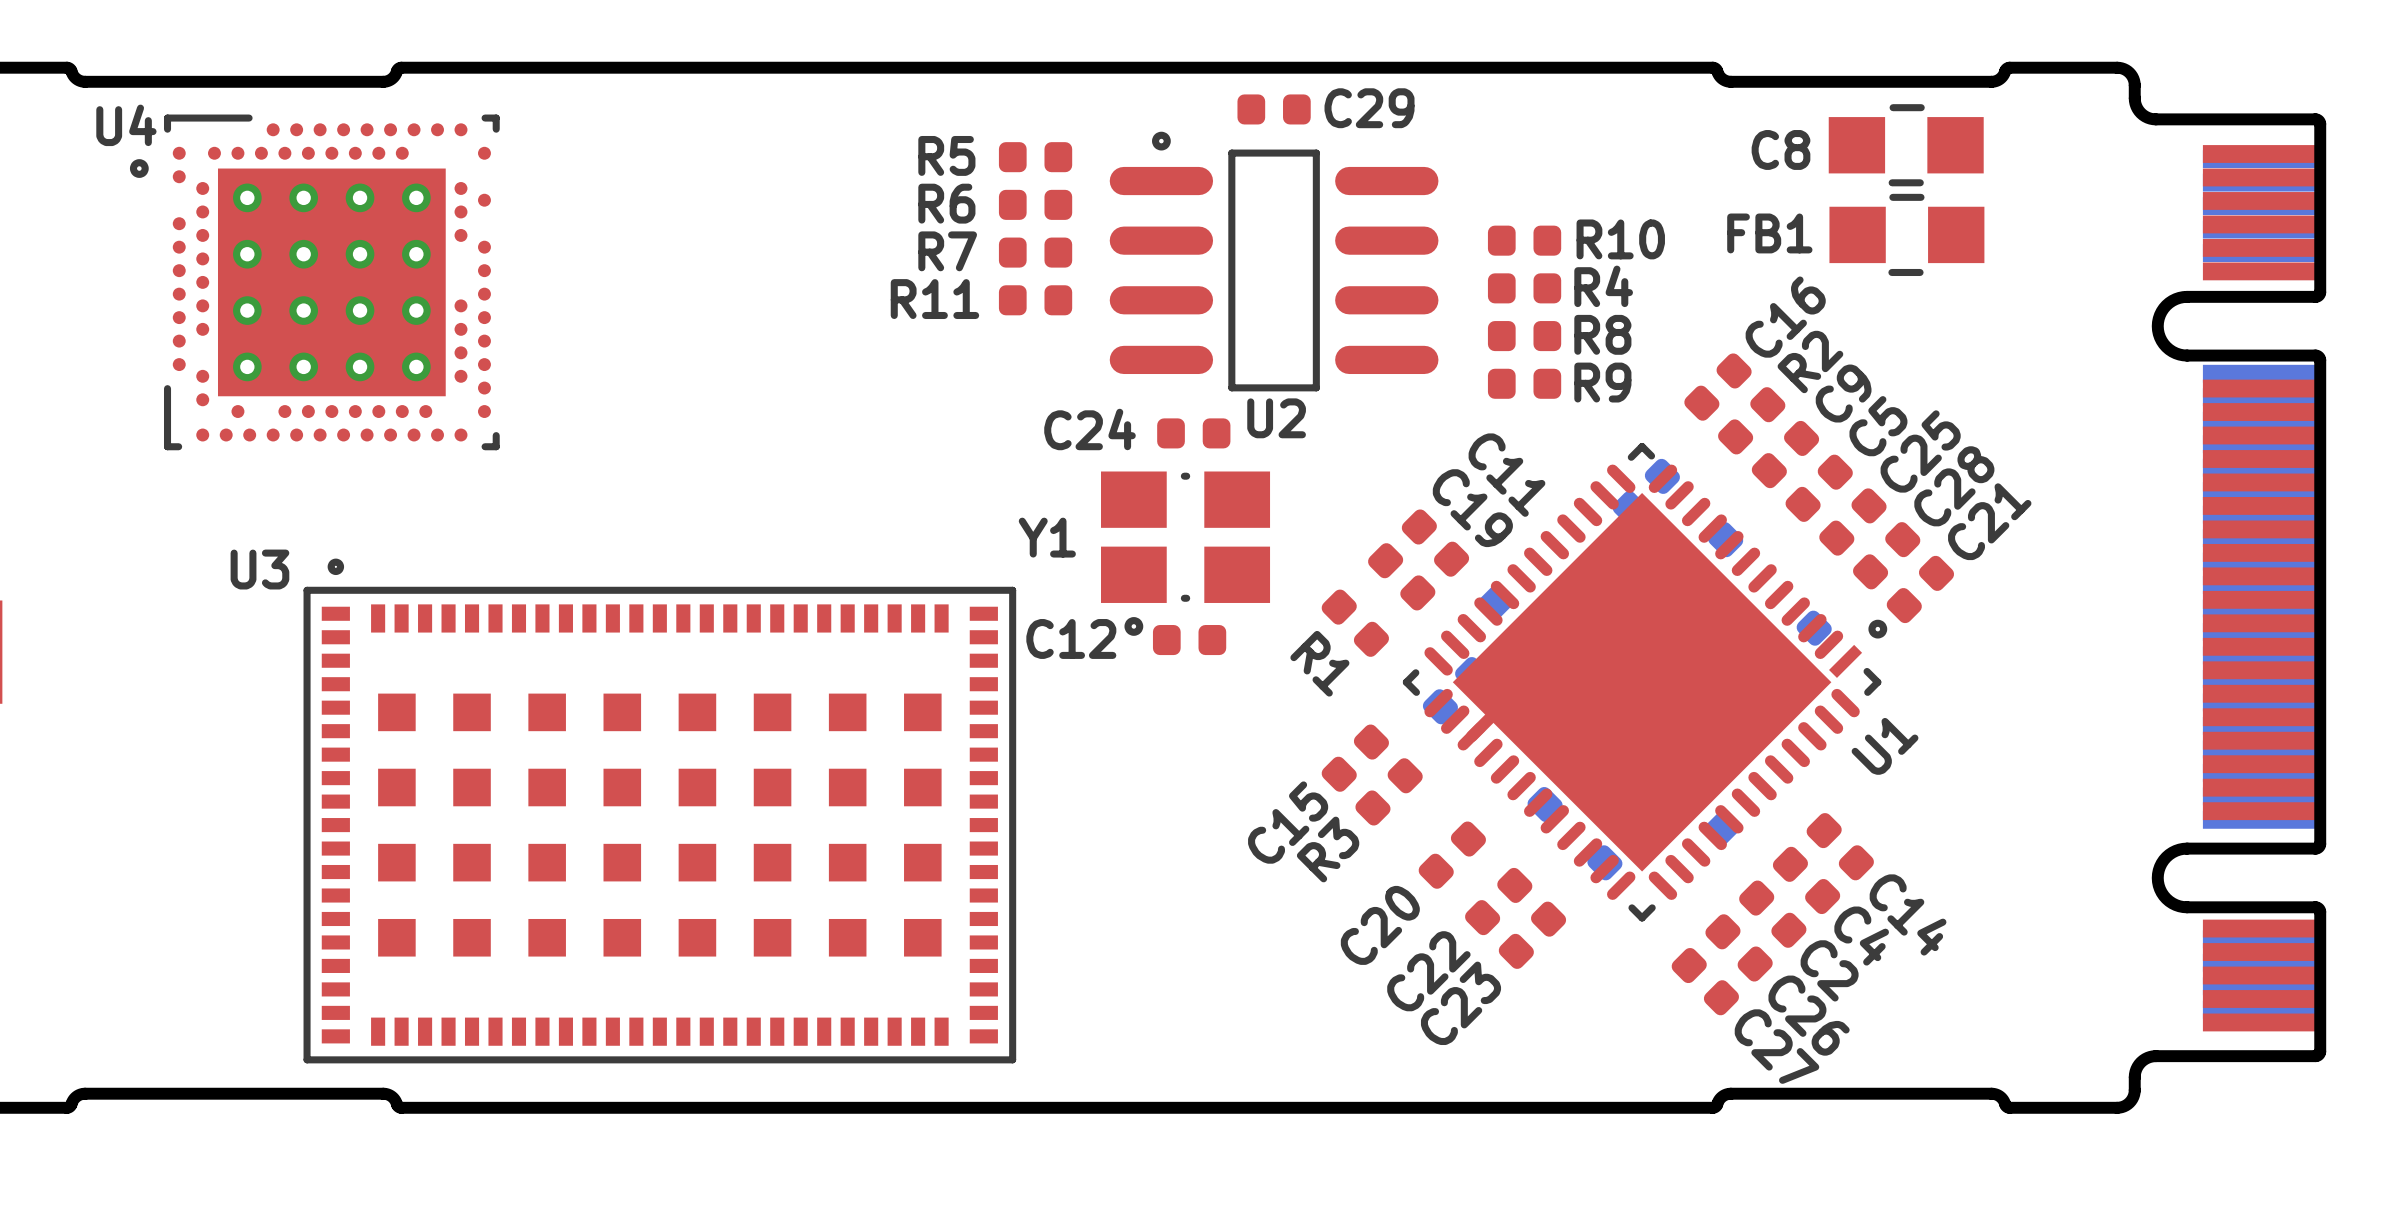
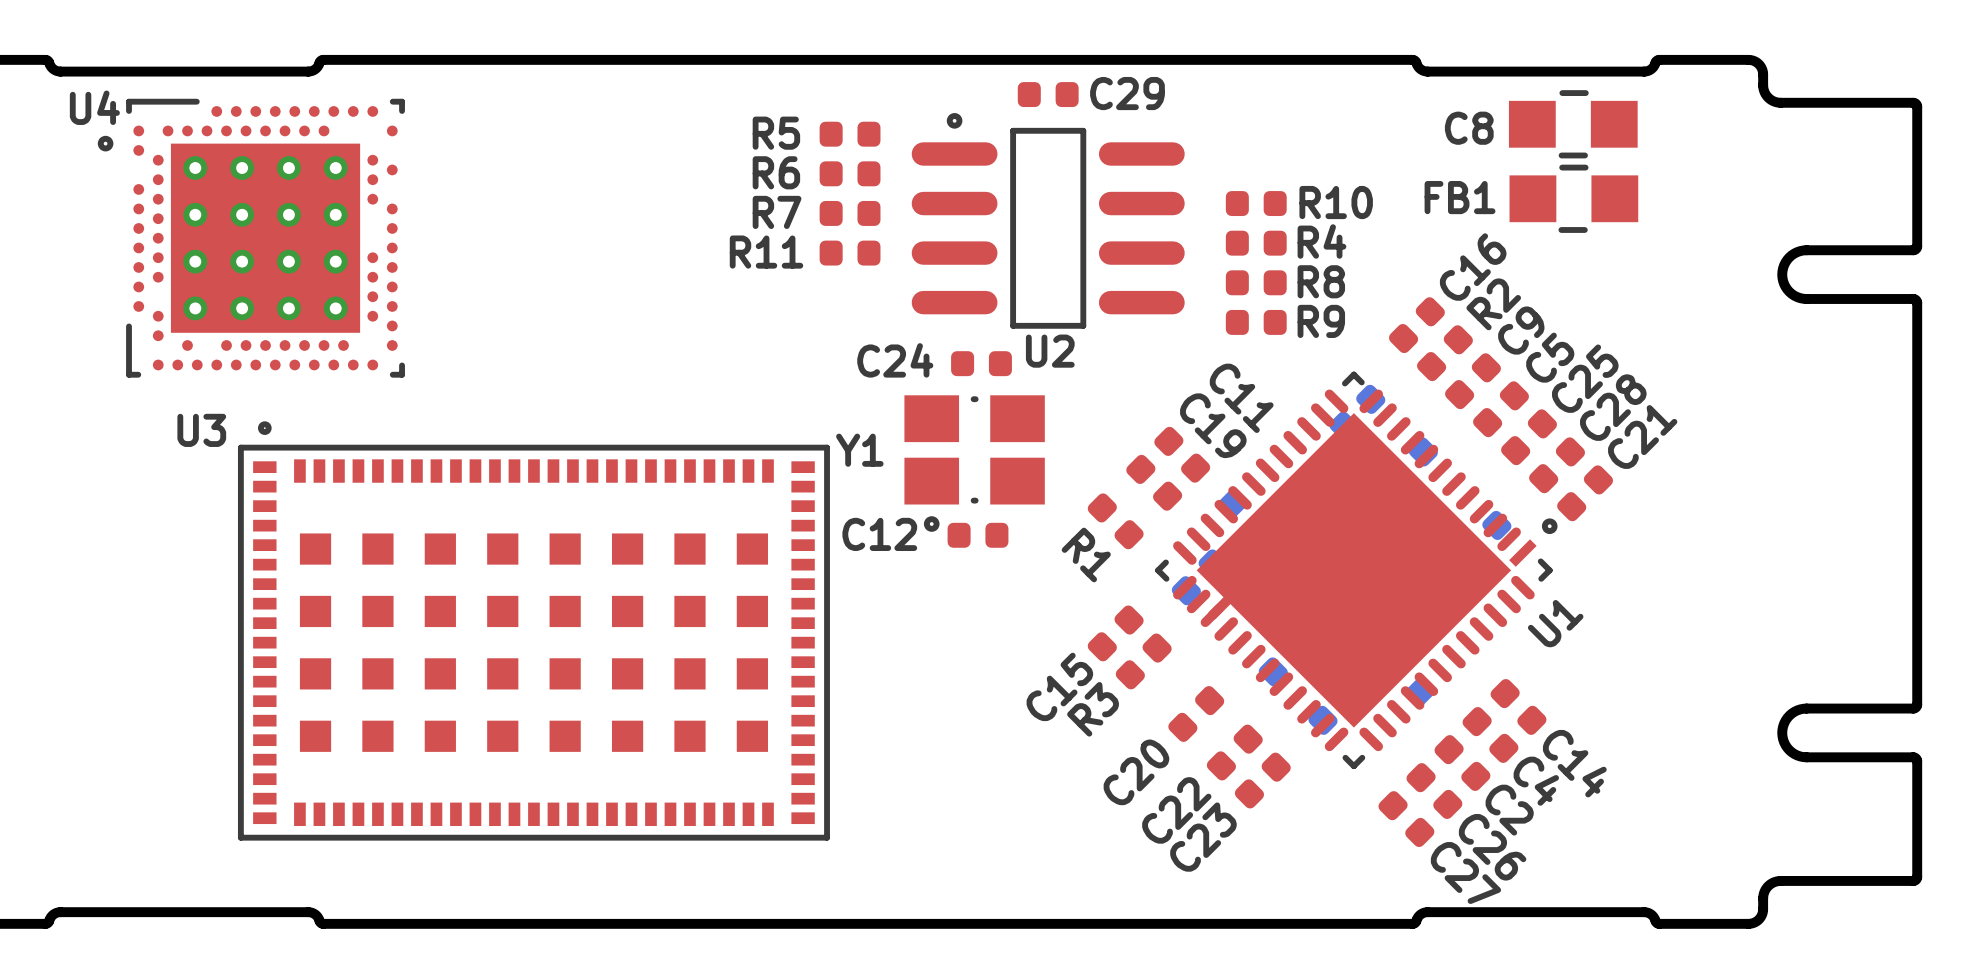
part: (2259, 588) -> none
U3 position: (659, 810) -> (533, 630)

